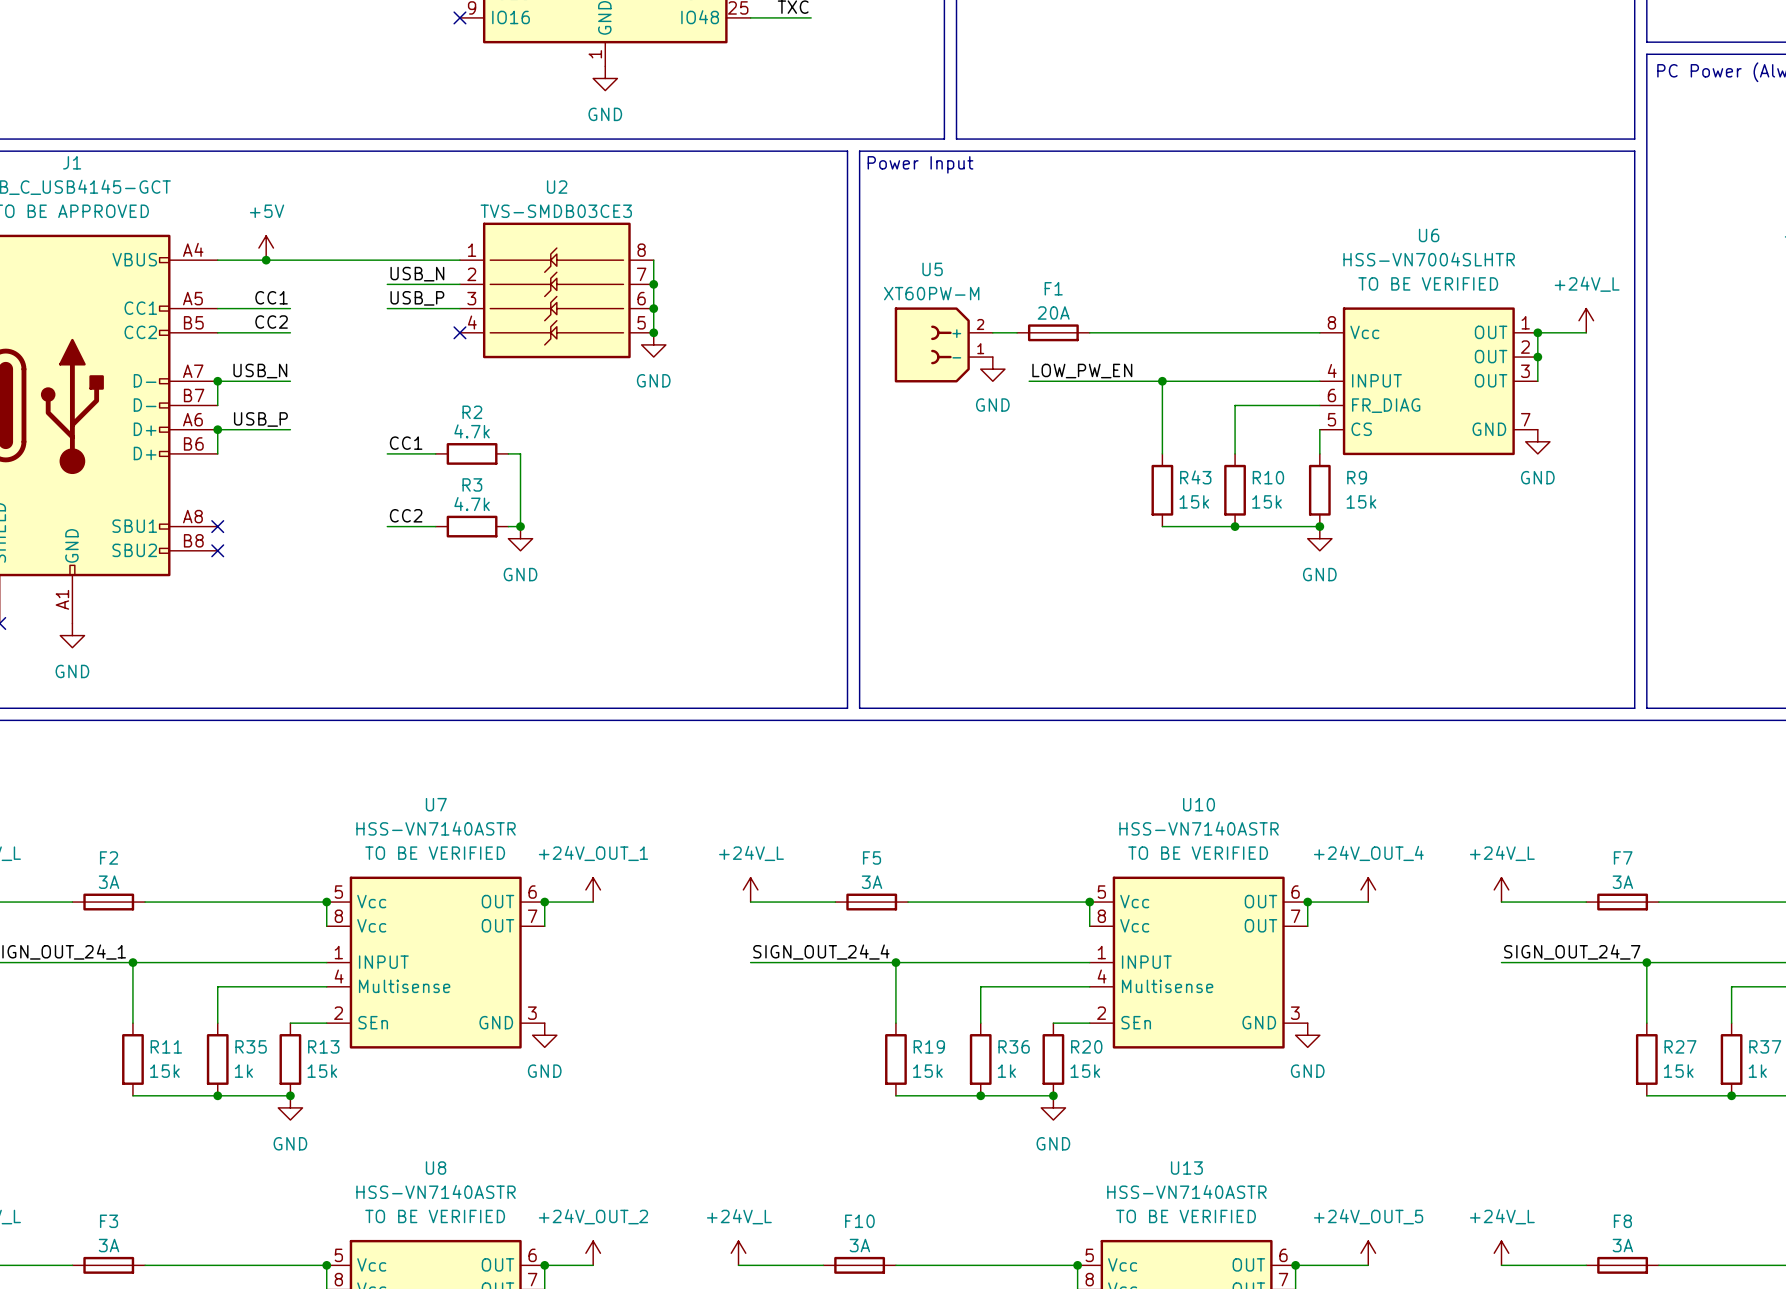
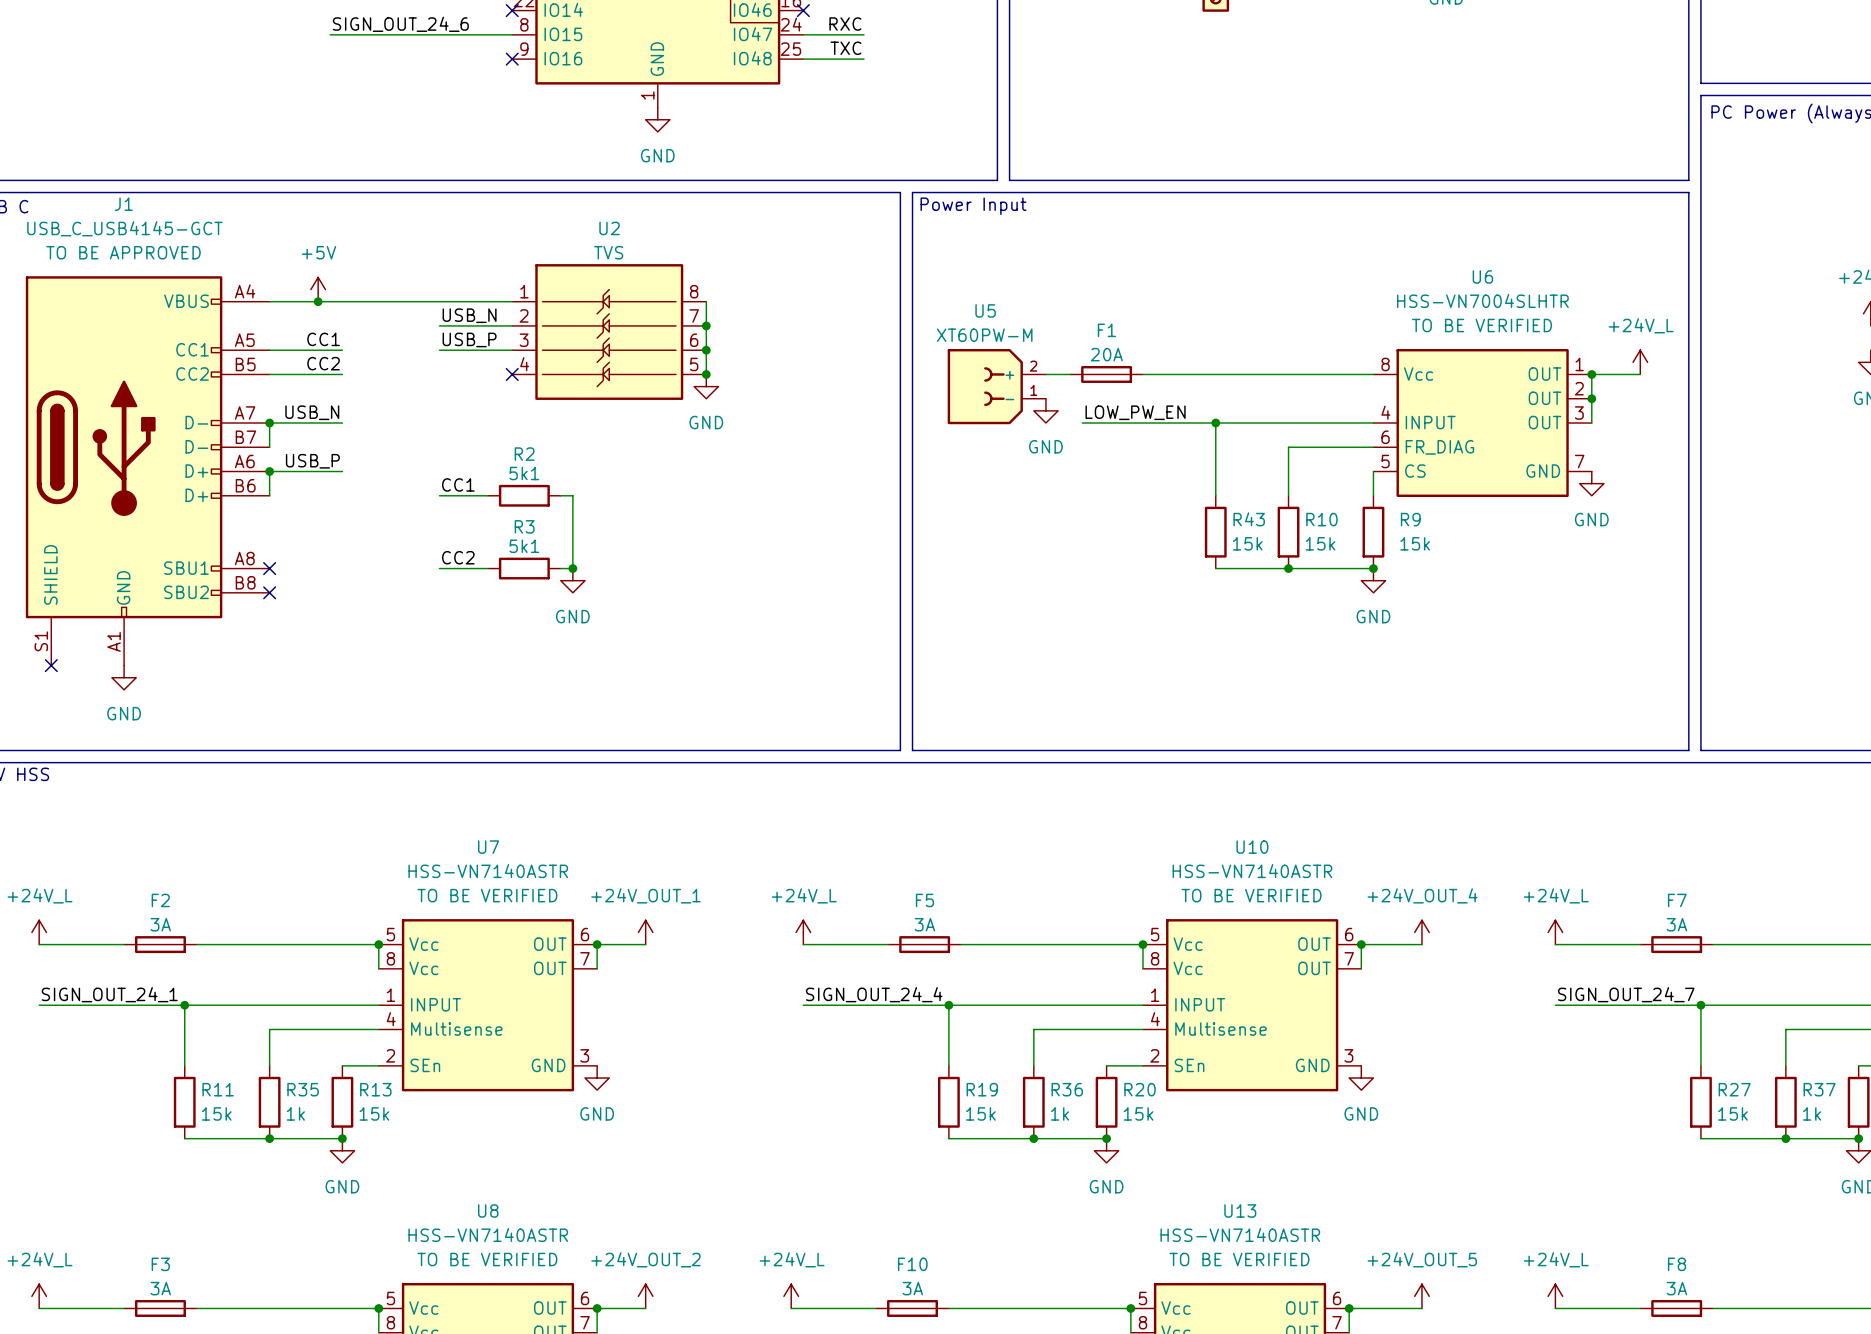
U2 value: TVS-SMDB03CE3 (556, 211) -> TVS (608, 252)
R2 value: 4.7k (472, 431) -> 5k1 (524, 473)
R3 value: 4.7k (472, 504) -> 5k1 (524, 546)

